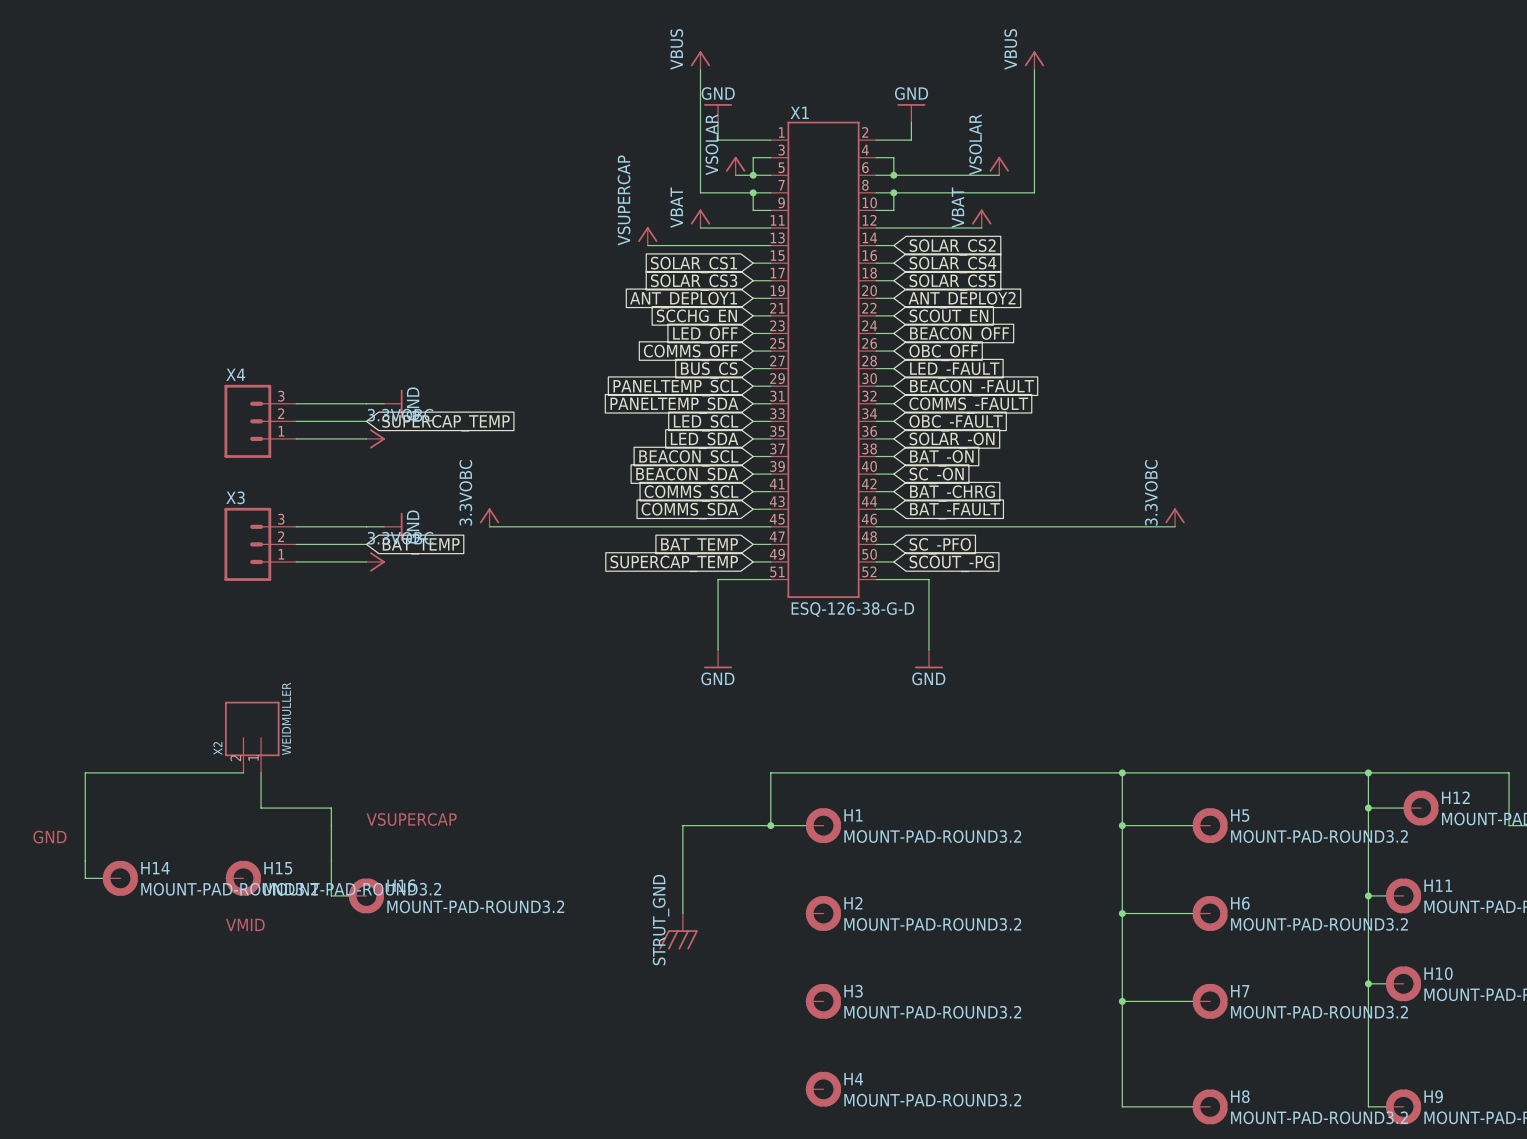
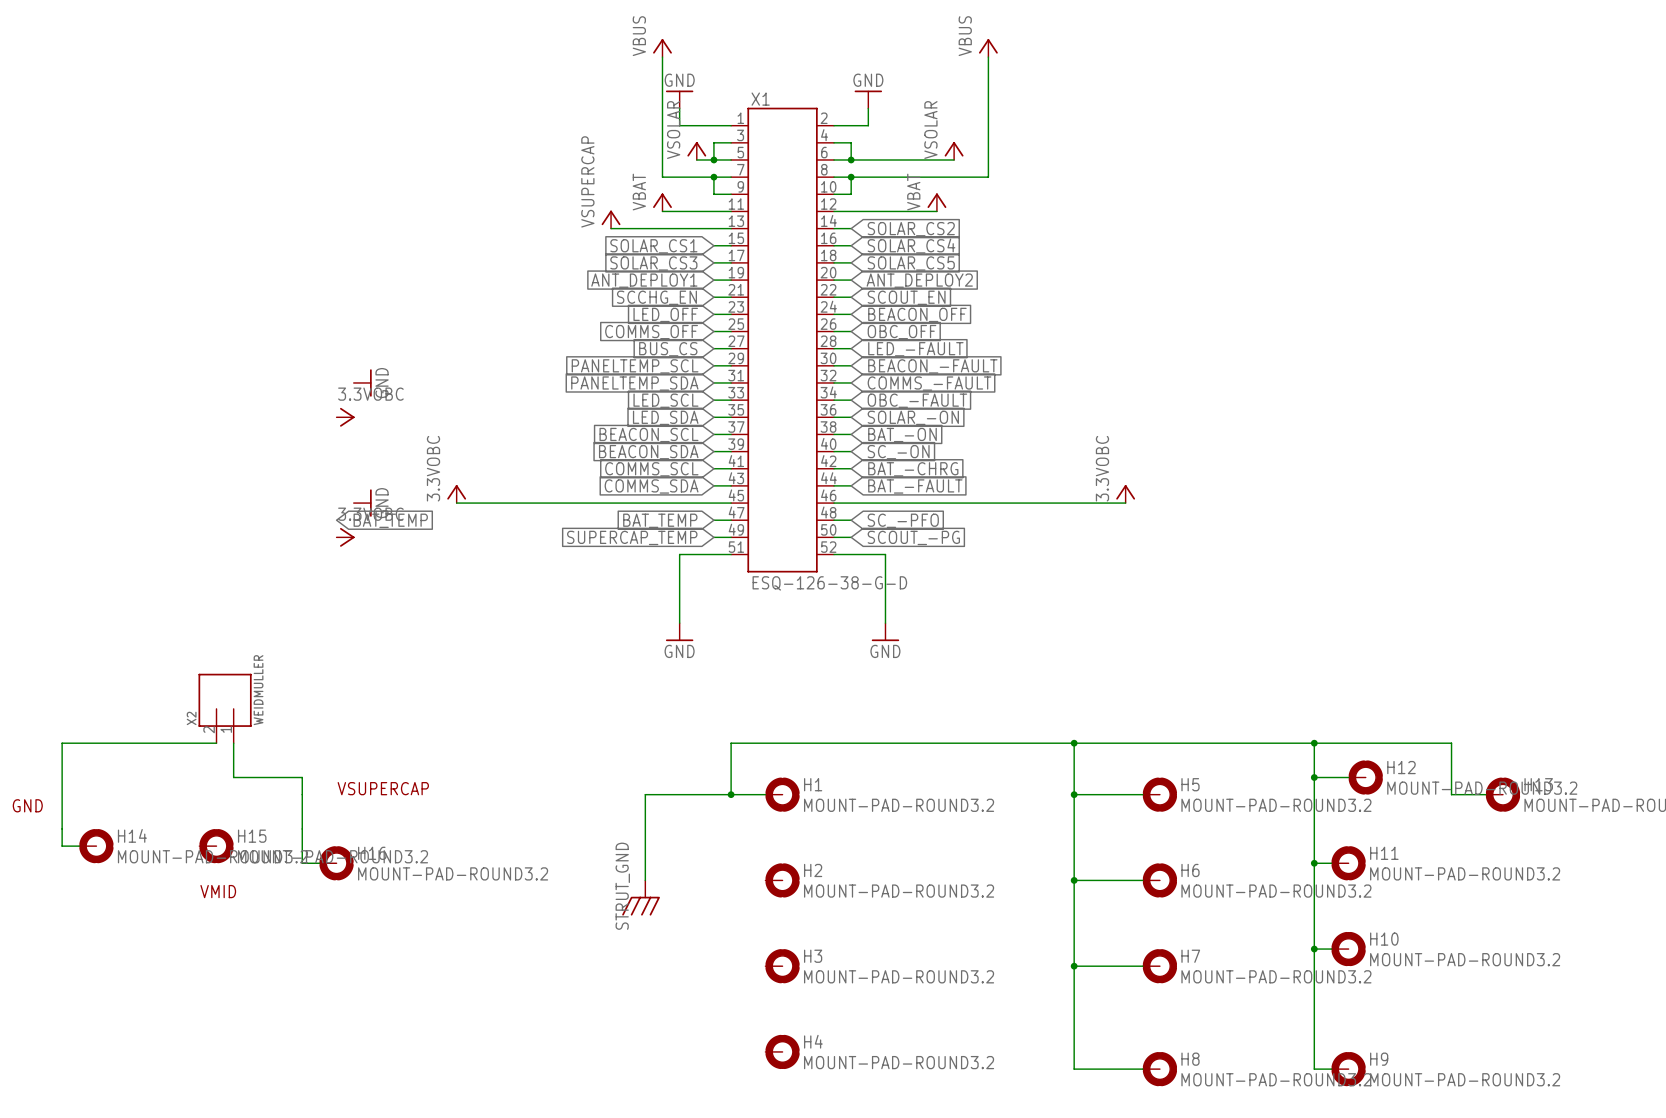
wire: (296, 403) (384, 403) -> none
X4: (260, 421) -> none
wire: (296, 421) (366, 421) -> none
global label: SUPERCAP_TEMP (445, 423) -> none
wire: (296, 438) (366, 438) -> none
wire: (296, 526) (384, 526) -> none
X3: (260, 544) -> none
wire: (296, 544) (366, 544) -> none
wire: (296, 561) (366, 561) -> none

